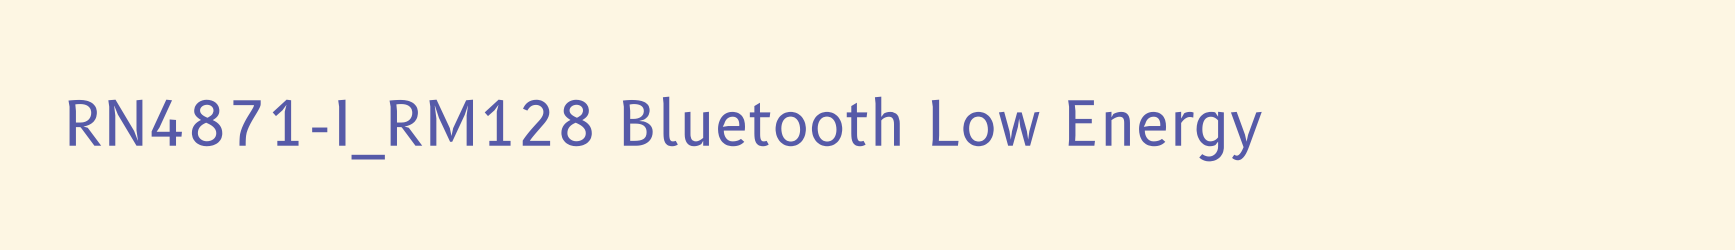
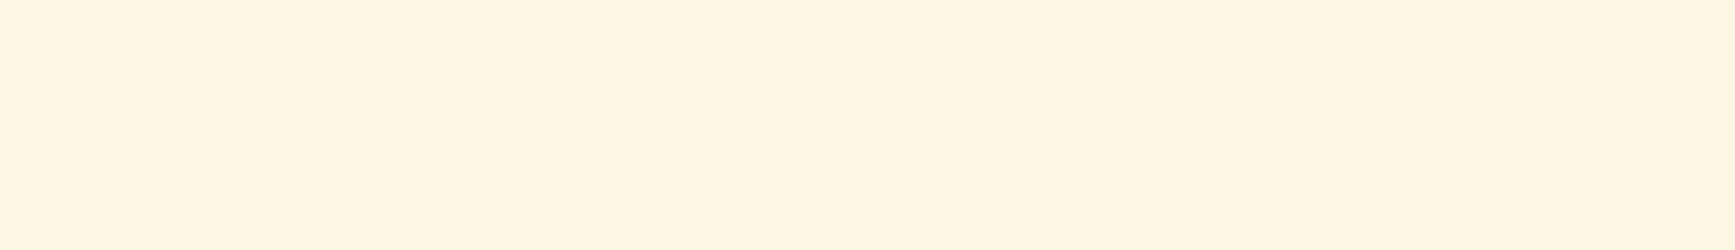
text: RN4871-I_RM128 Bluetooth Low Energy (665, 129) -> none

